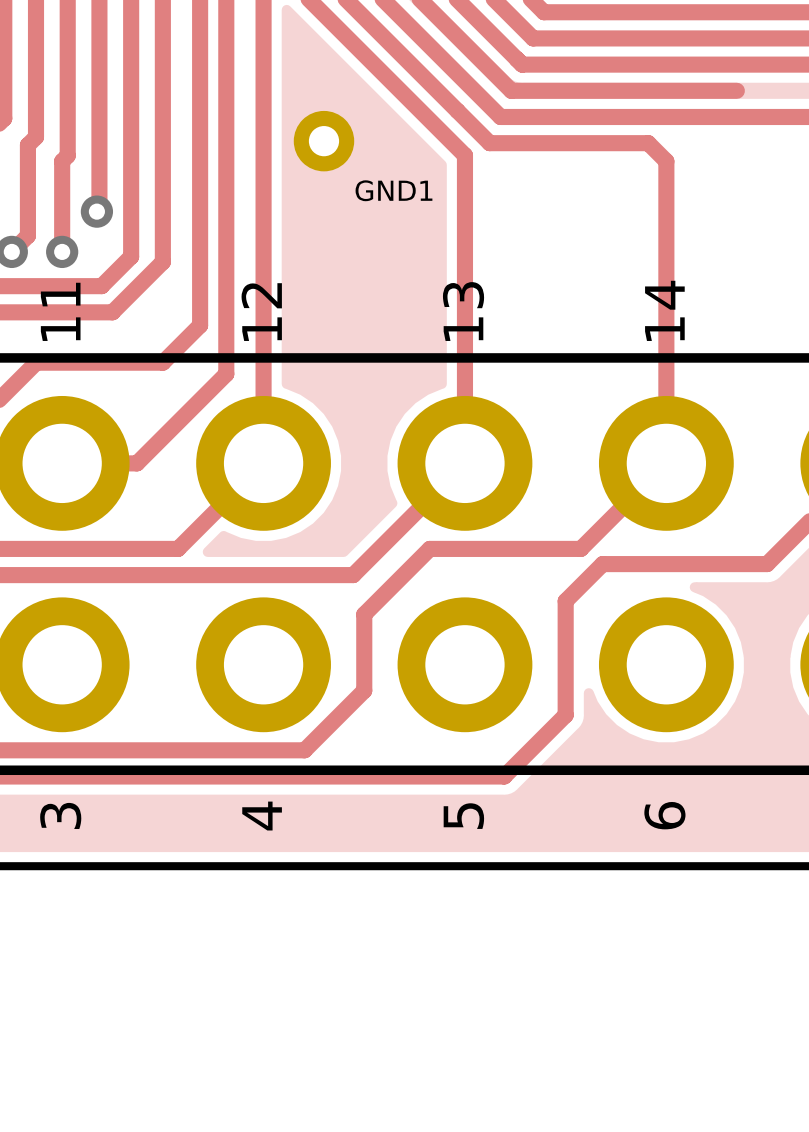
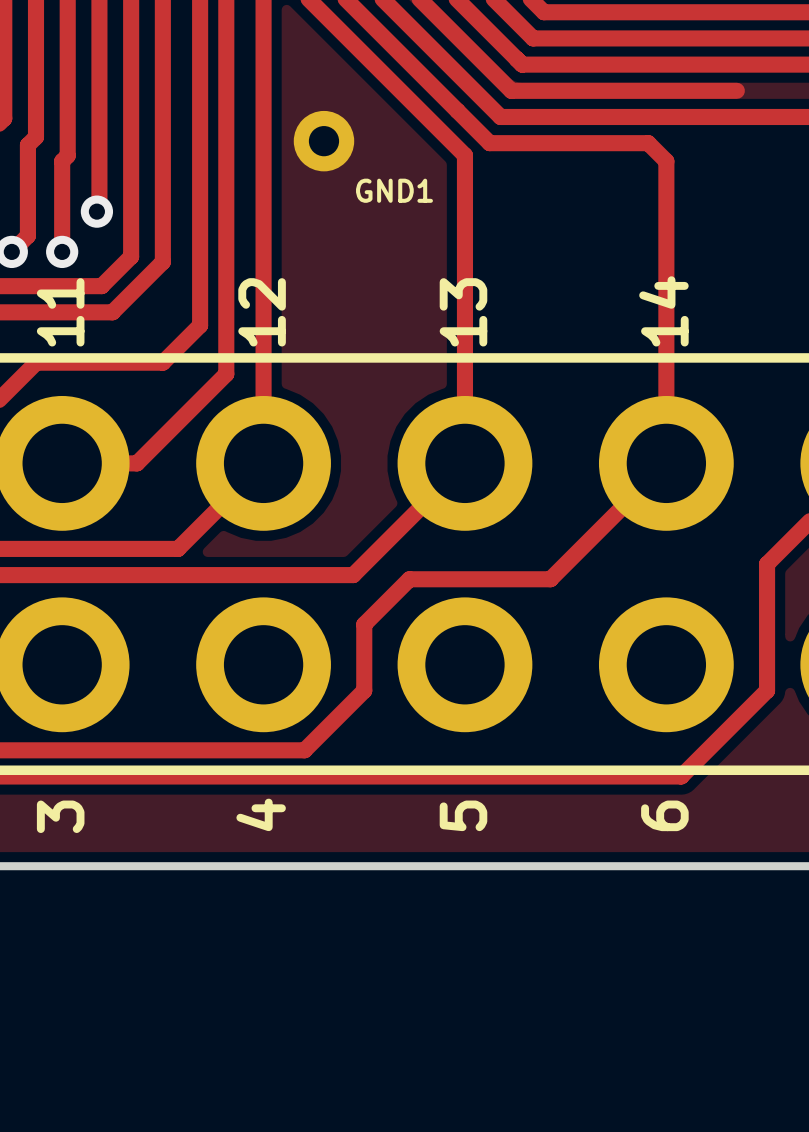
track: (580, 548) (429, 548) (364, 614) (364, 624) -> (580, 548) (550, 579) (409, 579) (364, 624)
track: (767, 564) (602, 564) (565, 601) (565, 715) (504, 776) -> (767, 564) (767, 690) (681, 776) (504, 776)

